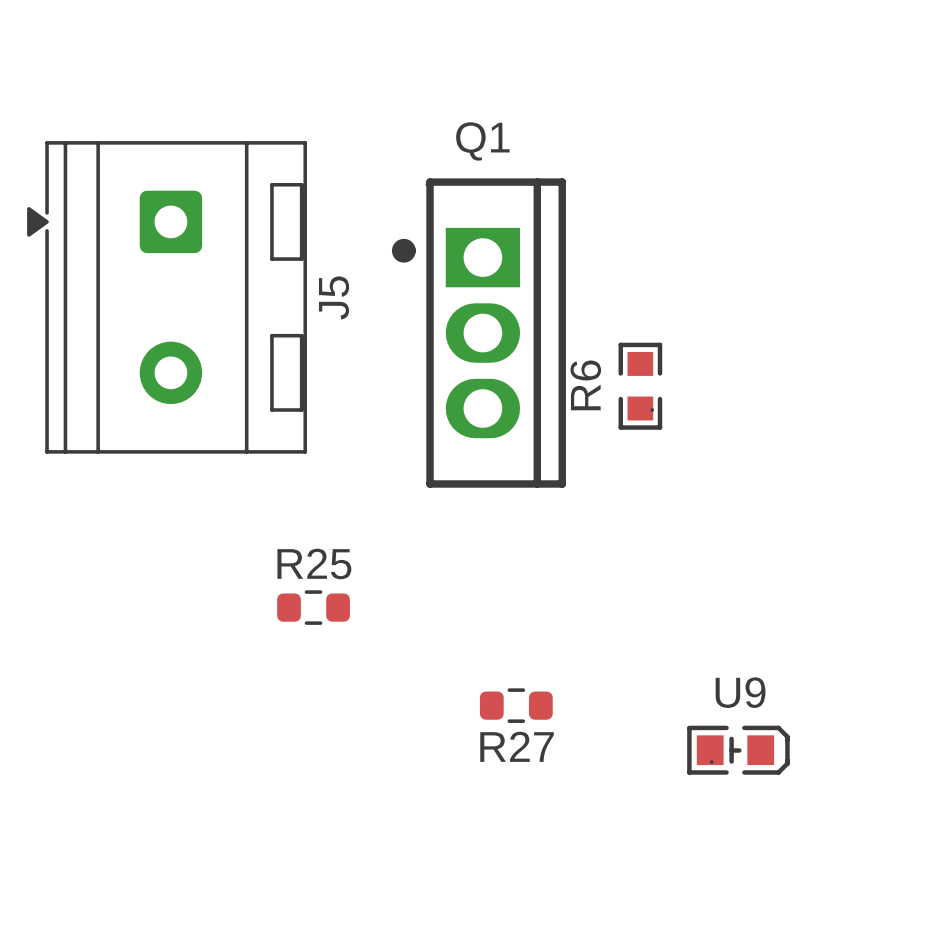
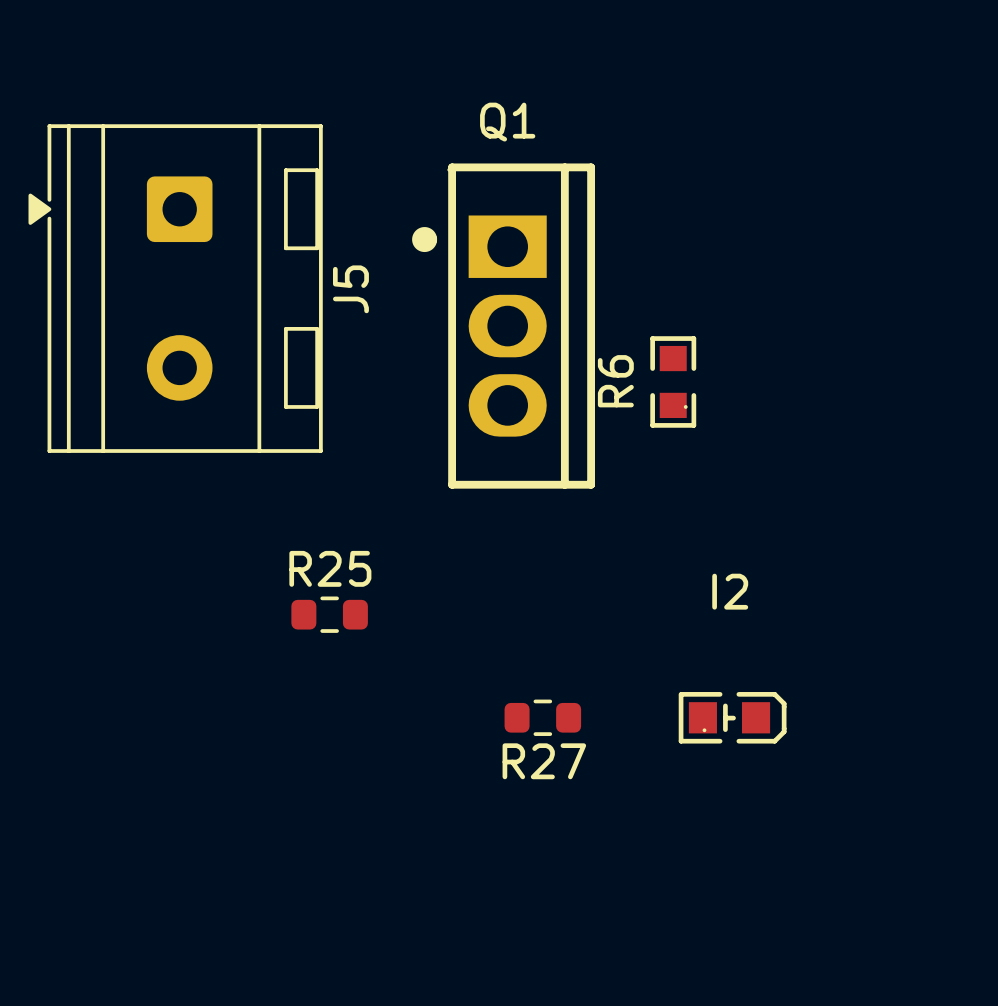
I2: none -> (732, 717)
U9: (738, 750) -> none

